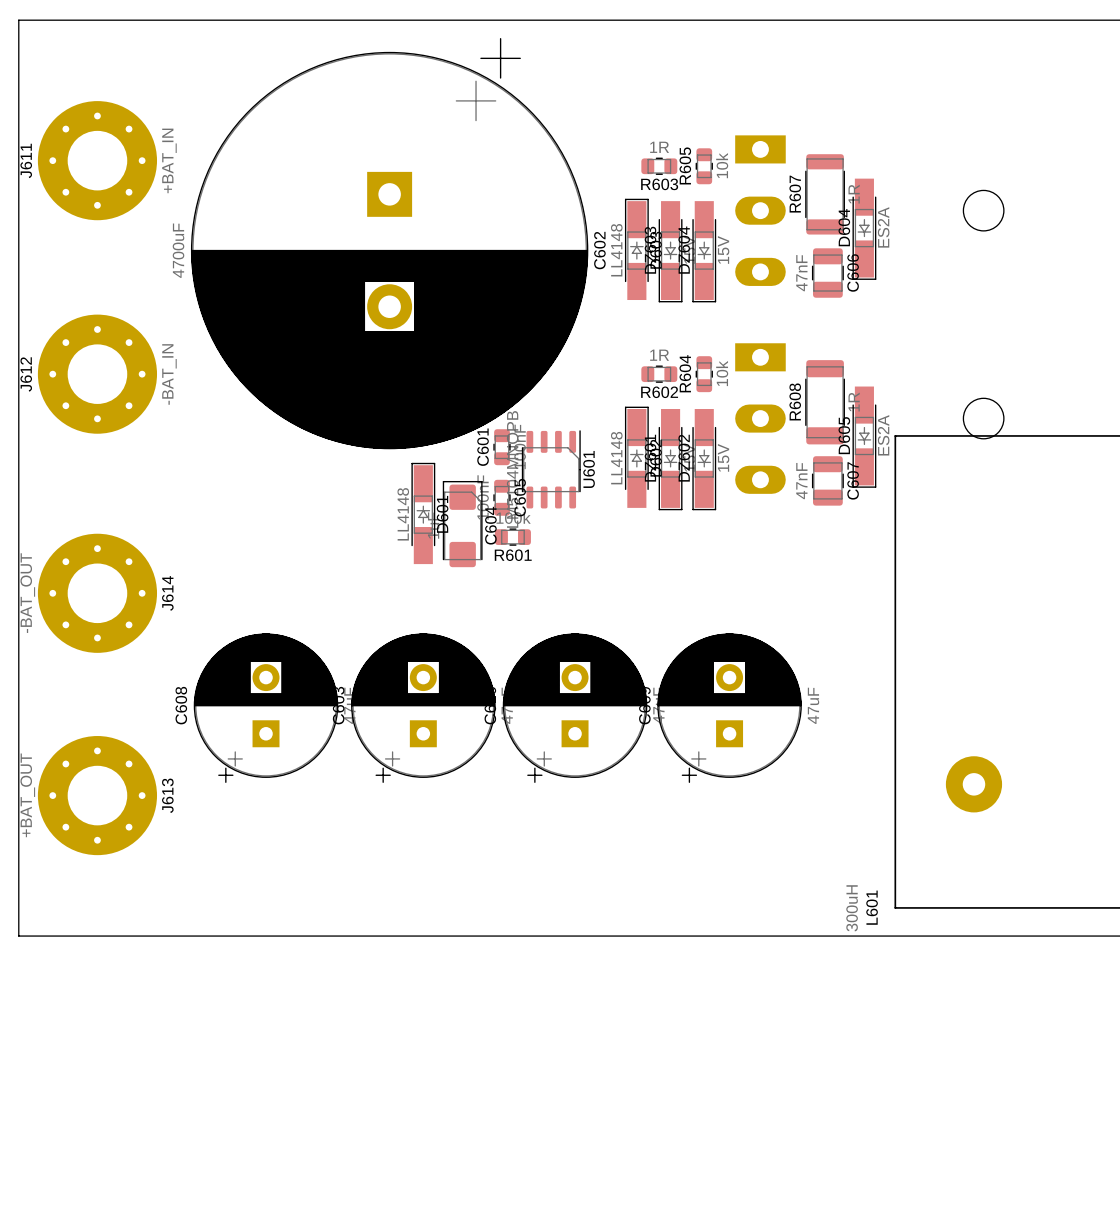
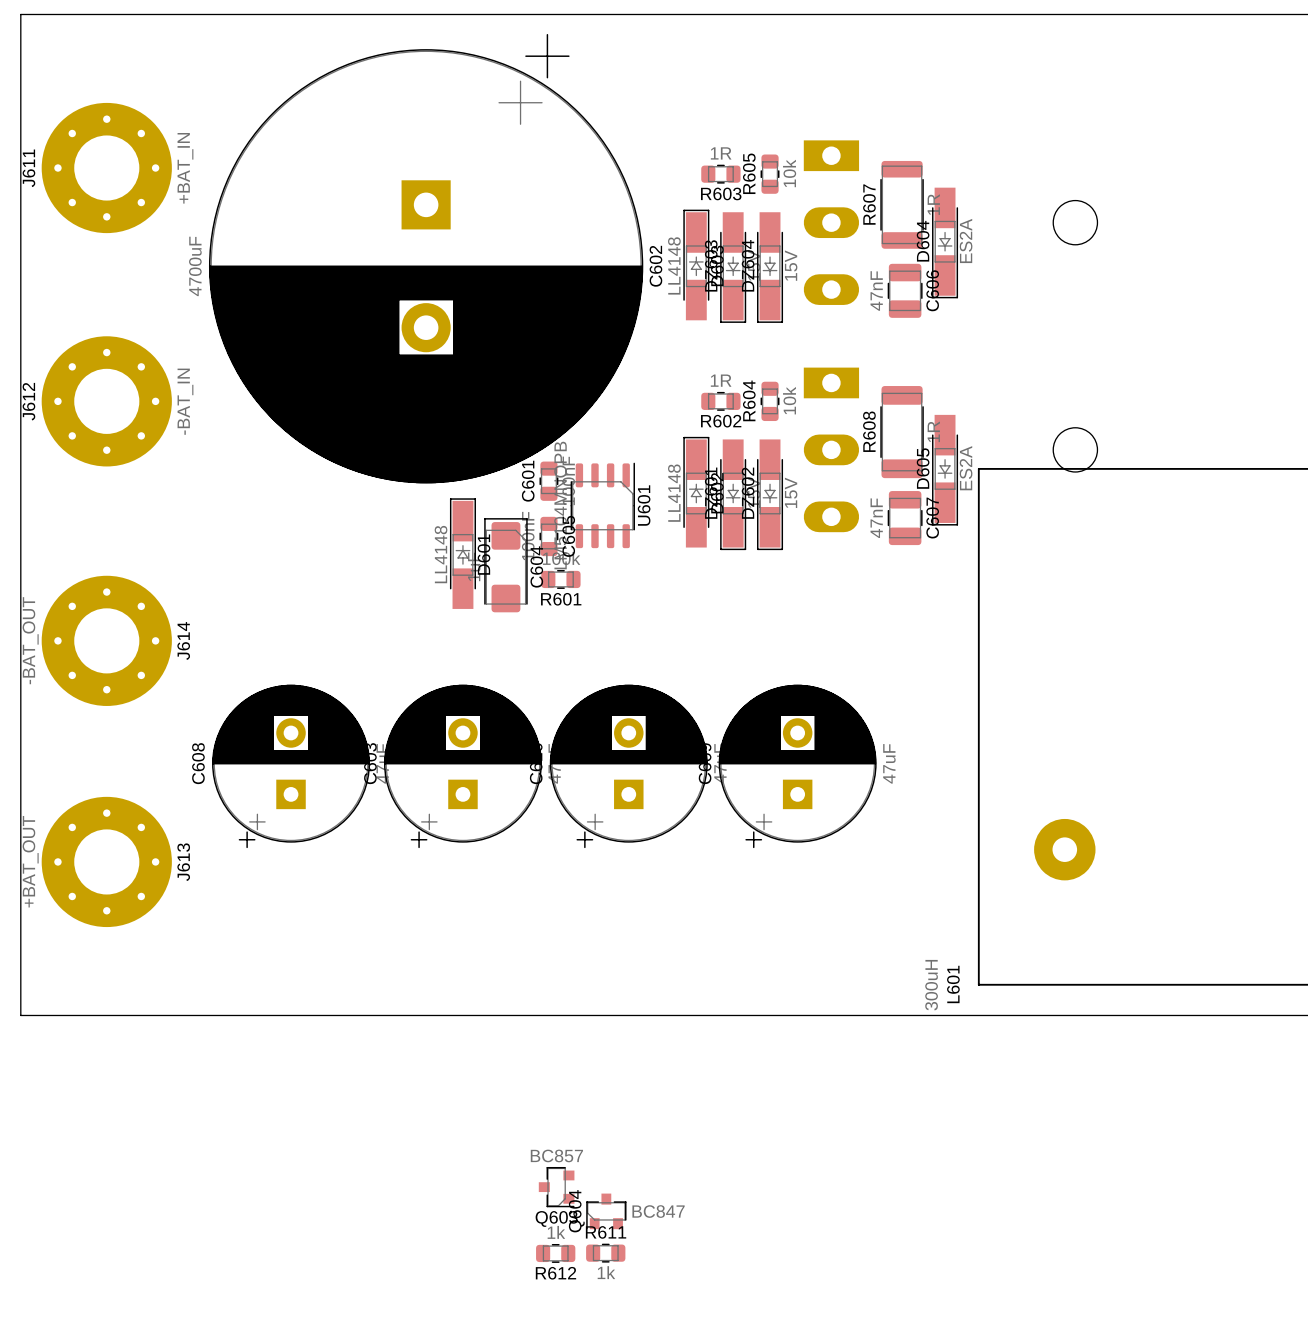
Q603: none -> BC857 (556, 1187)
Q604: none -> BC847 (606, 1211)
R612: none -> 1k (555, 1253)
R611: none -> 1k (605, 1253)

